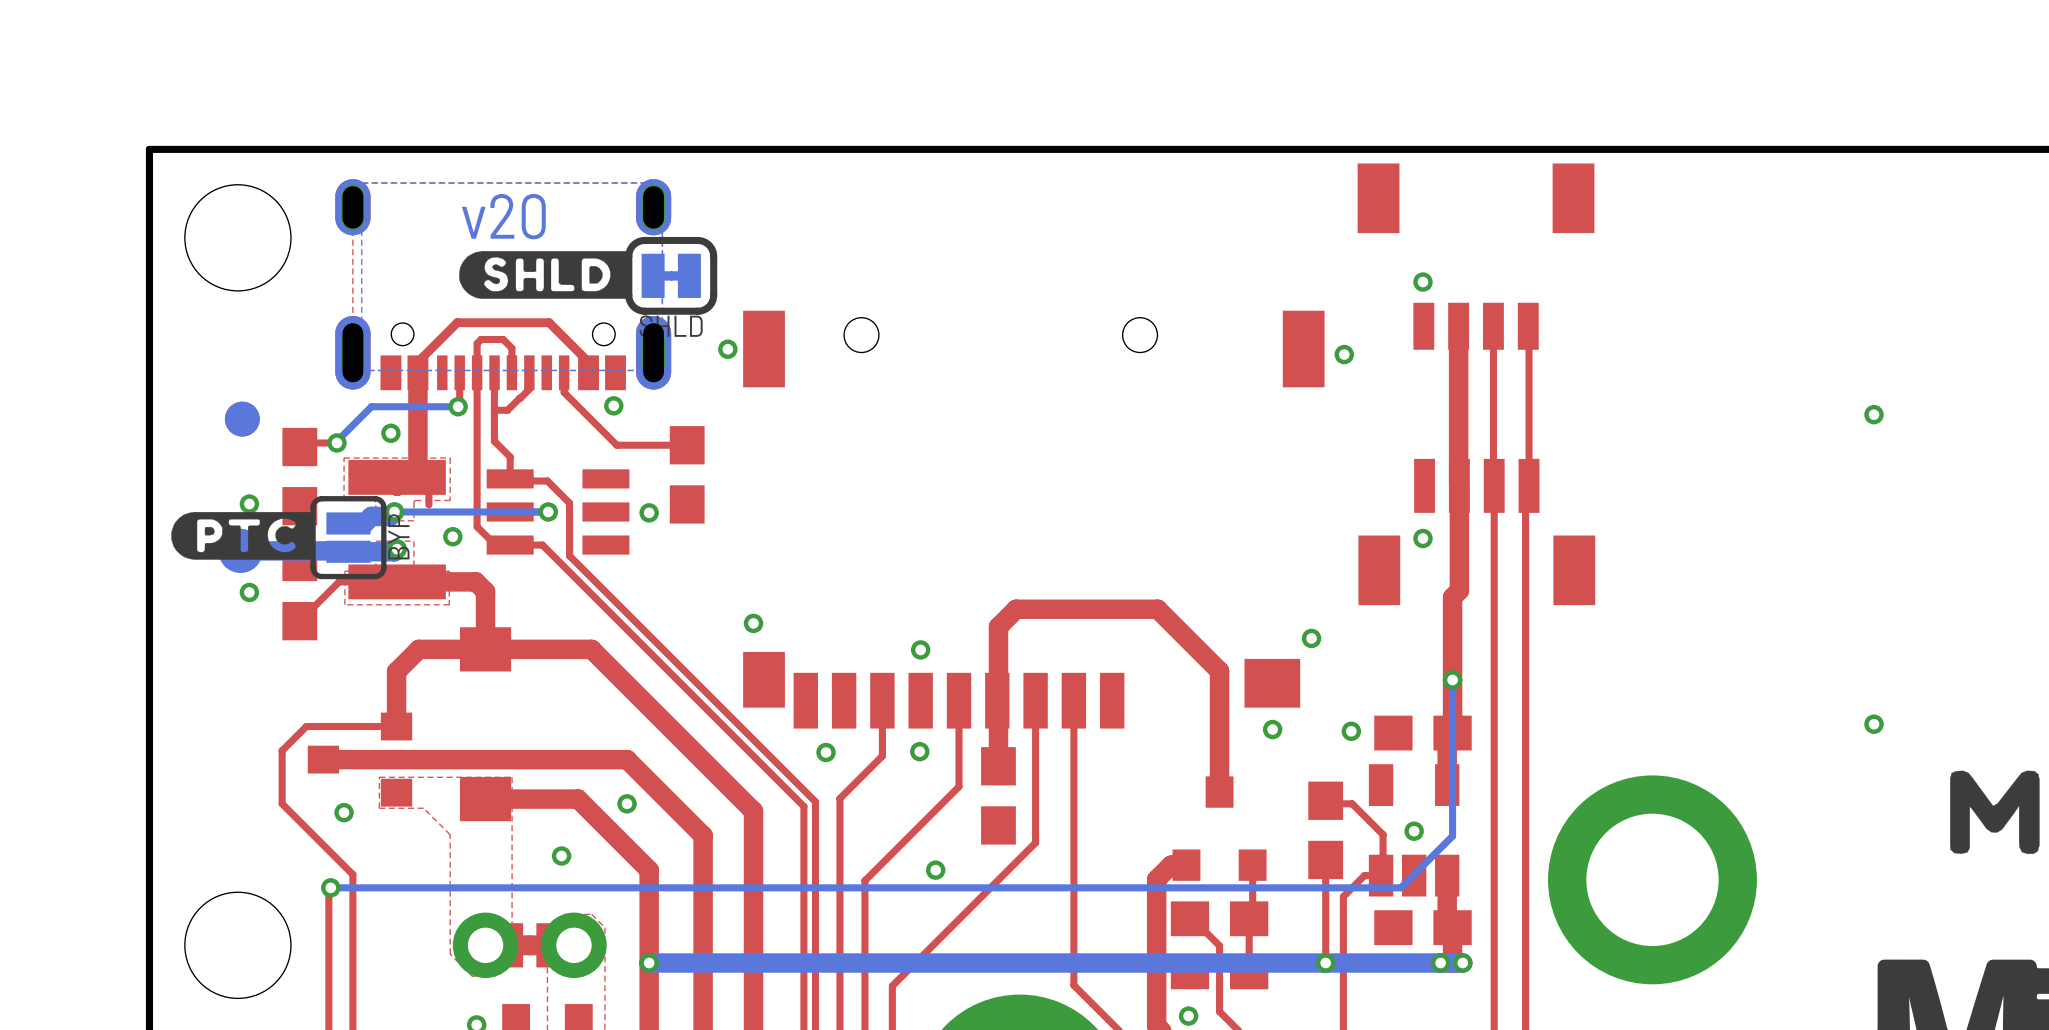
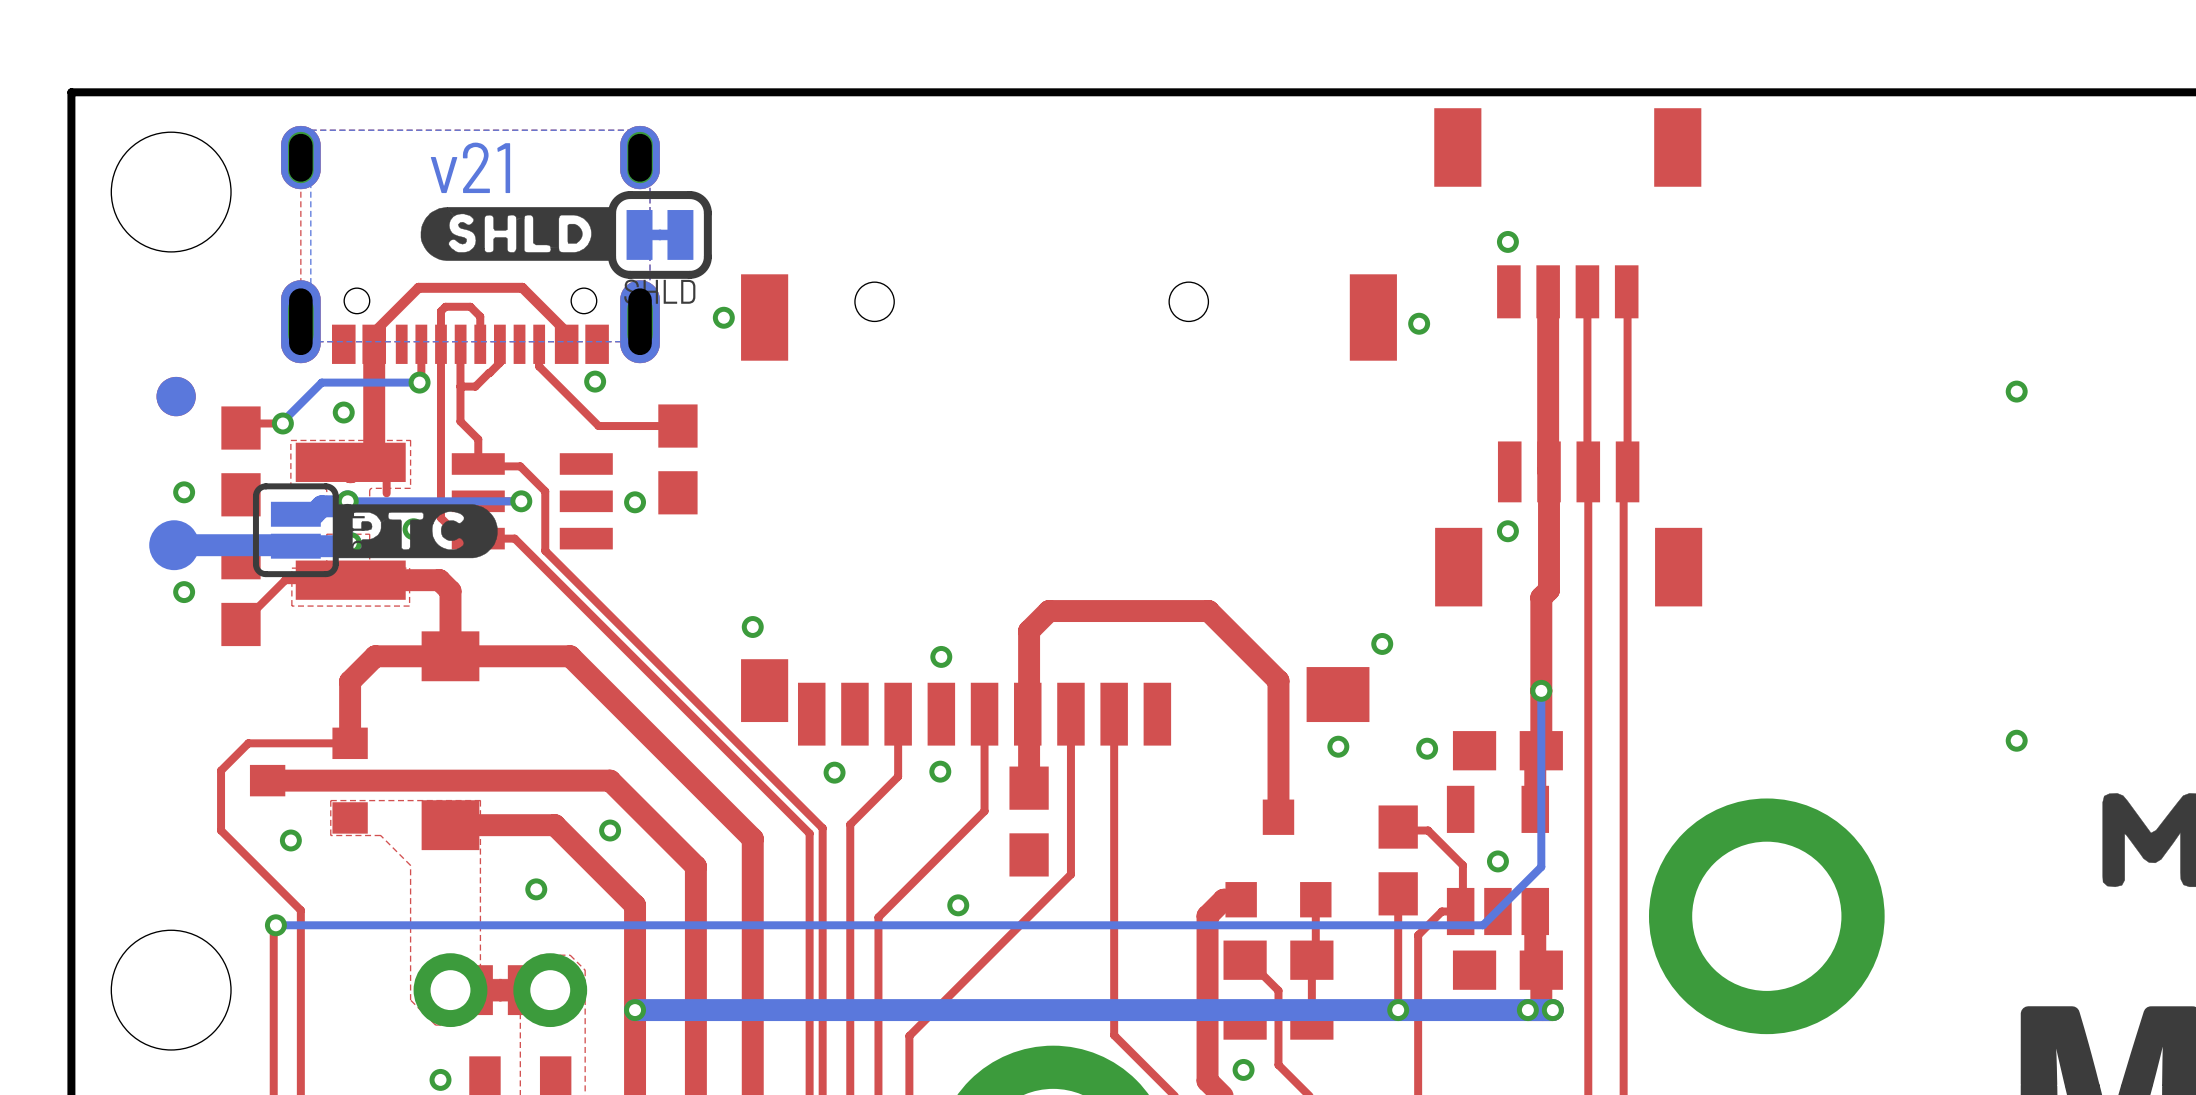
text: v20 (503, 216) -> v21 (470, 167)
drawing: [171, 512, 315, 560] -> none
drawing: none -> [336, 504, 498, 559]

